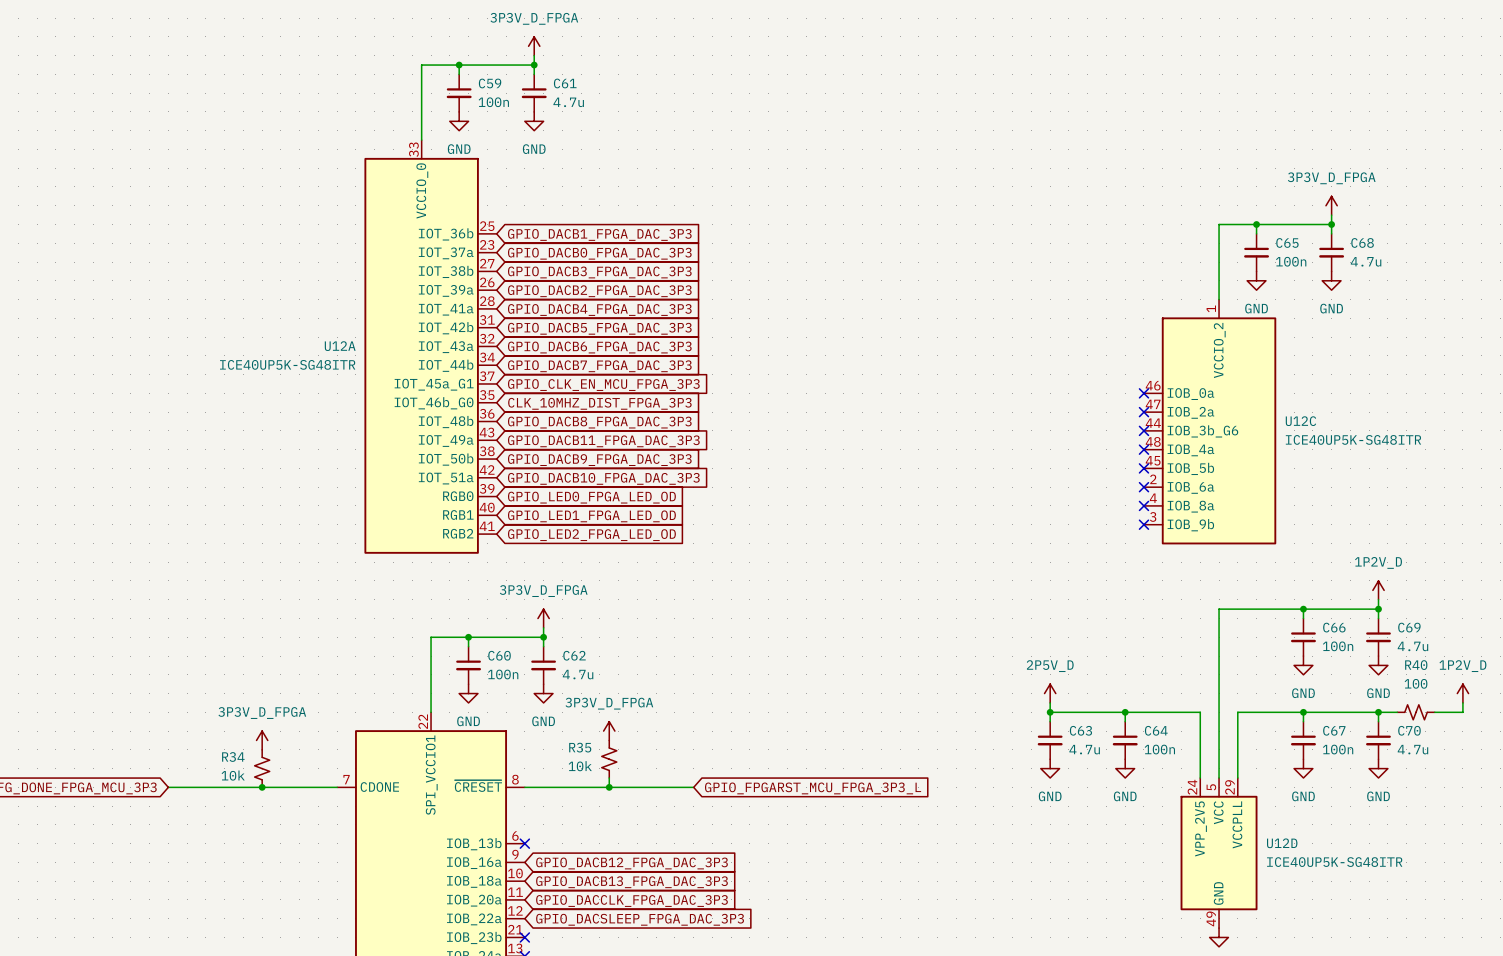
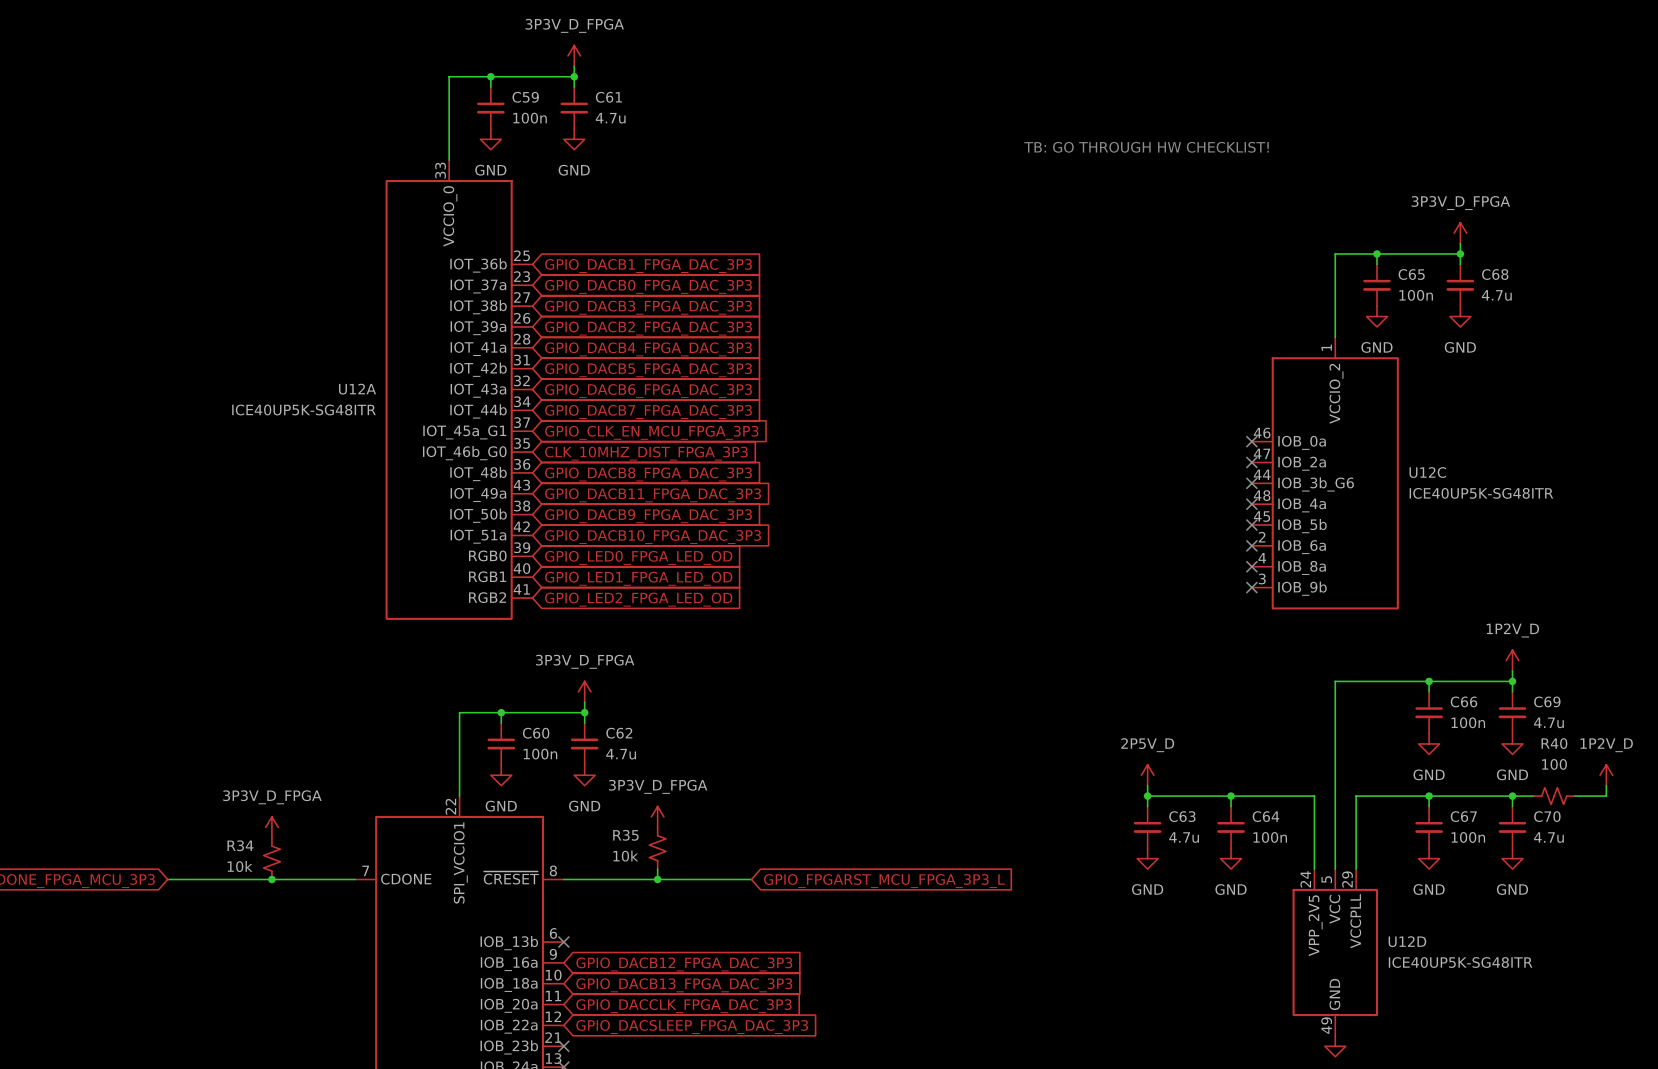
text: none -> TB: GO THROUGH HW CHECKLIST! (1146, 147)

